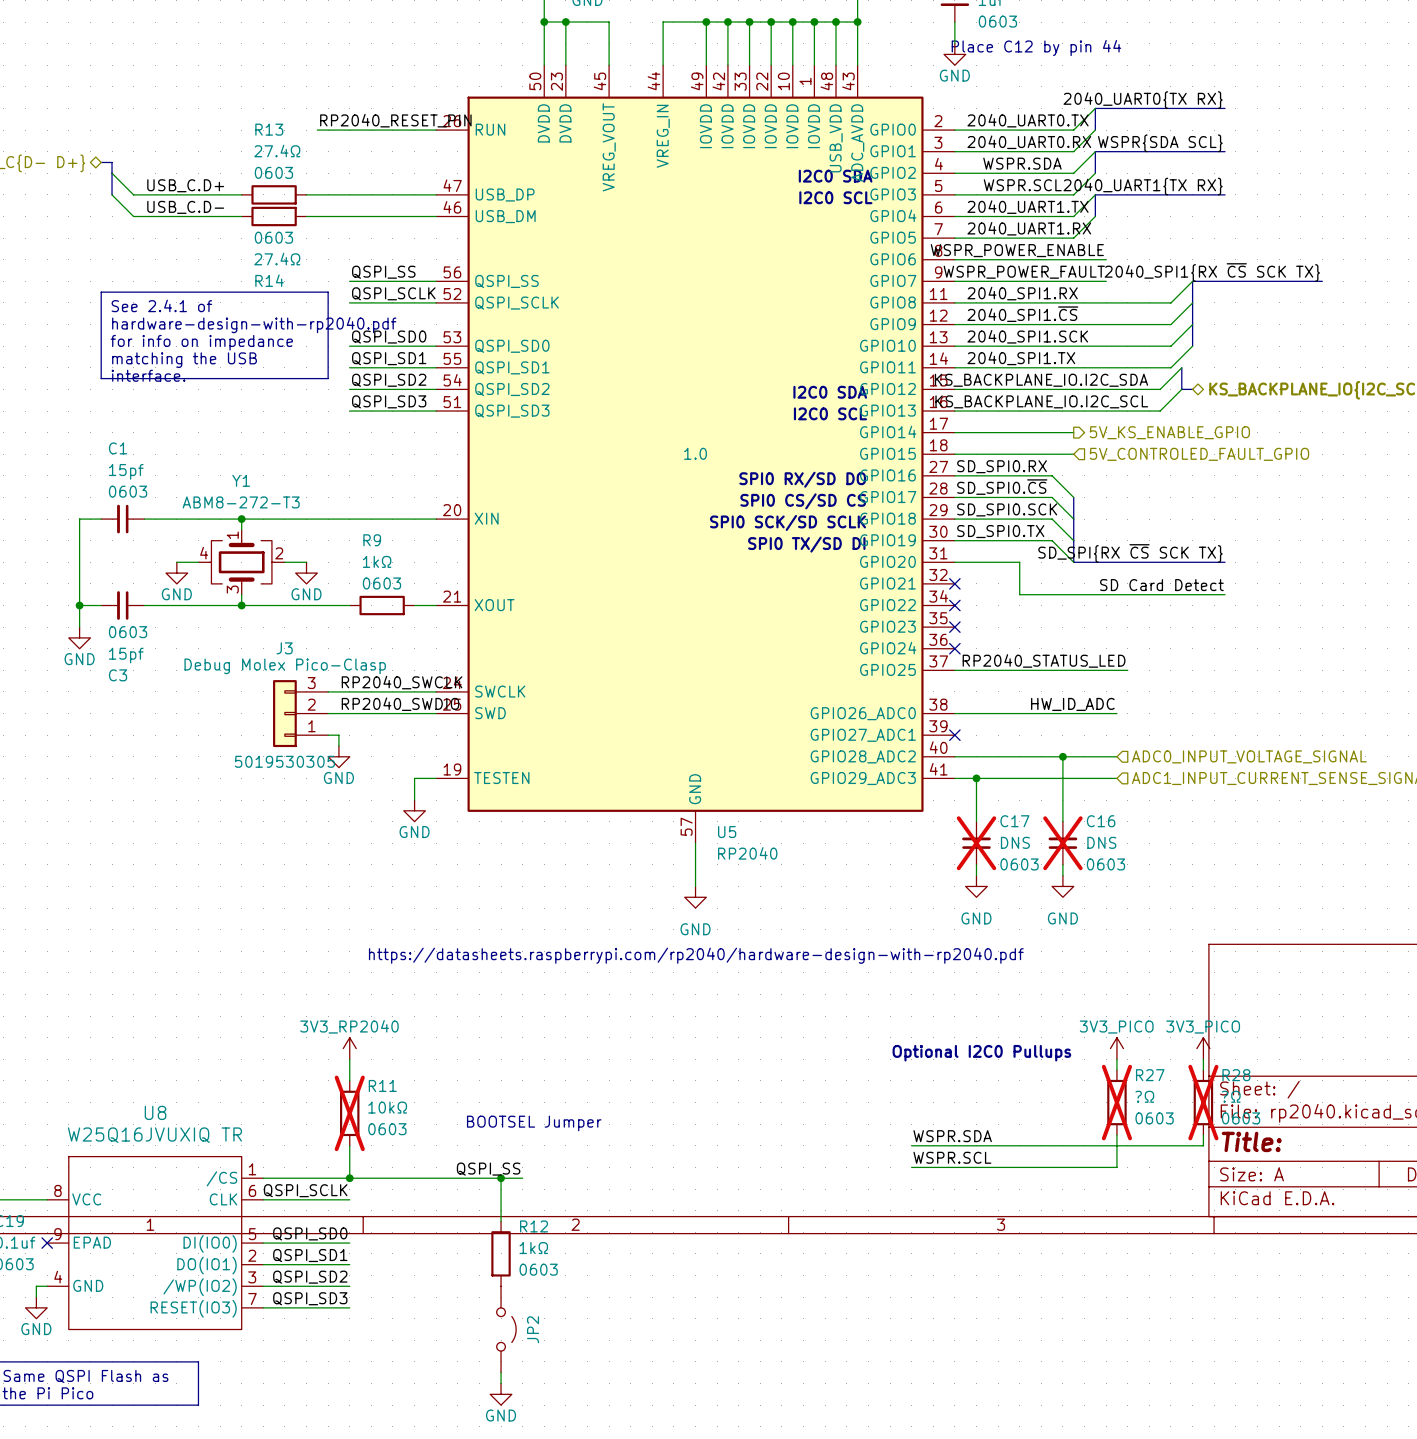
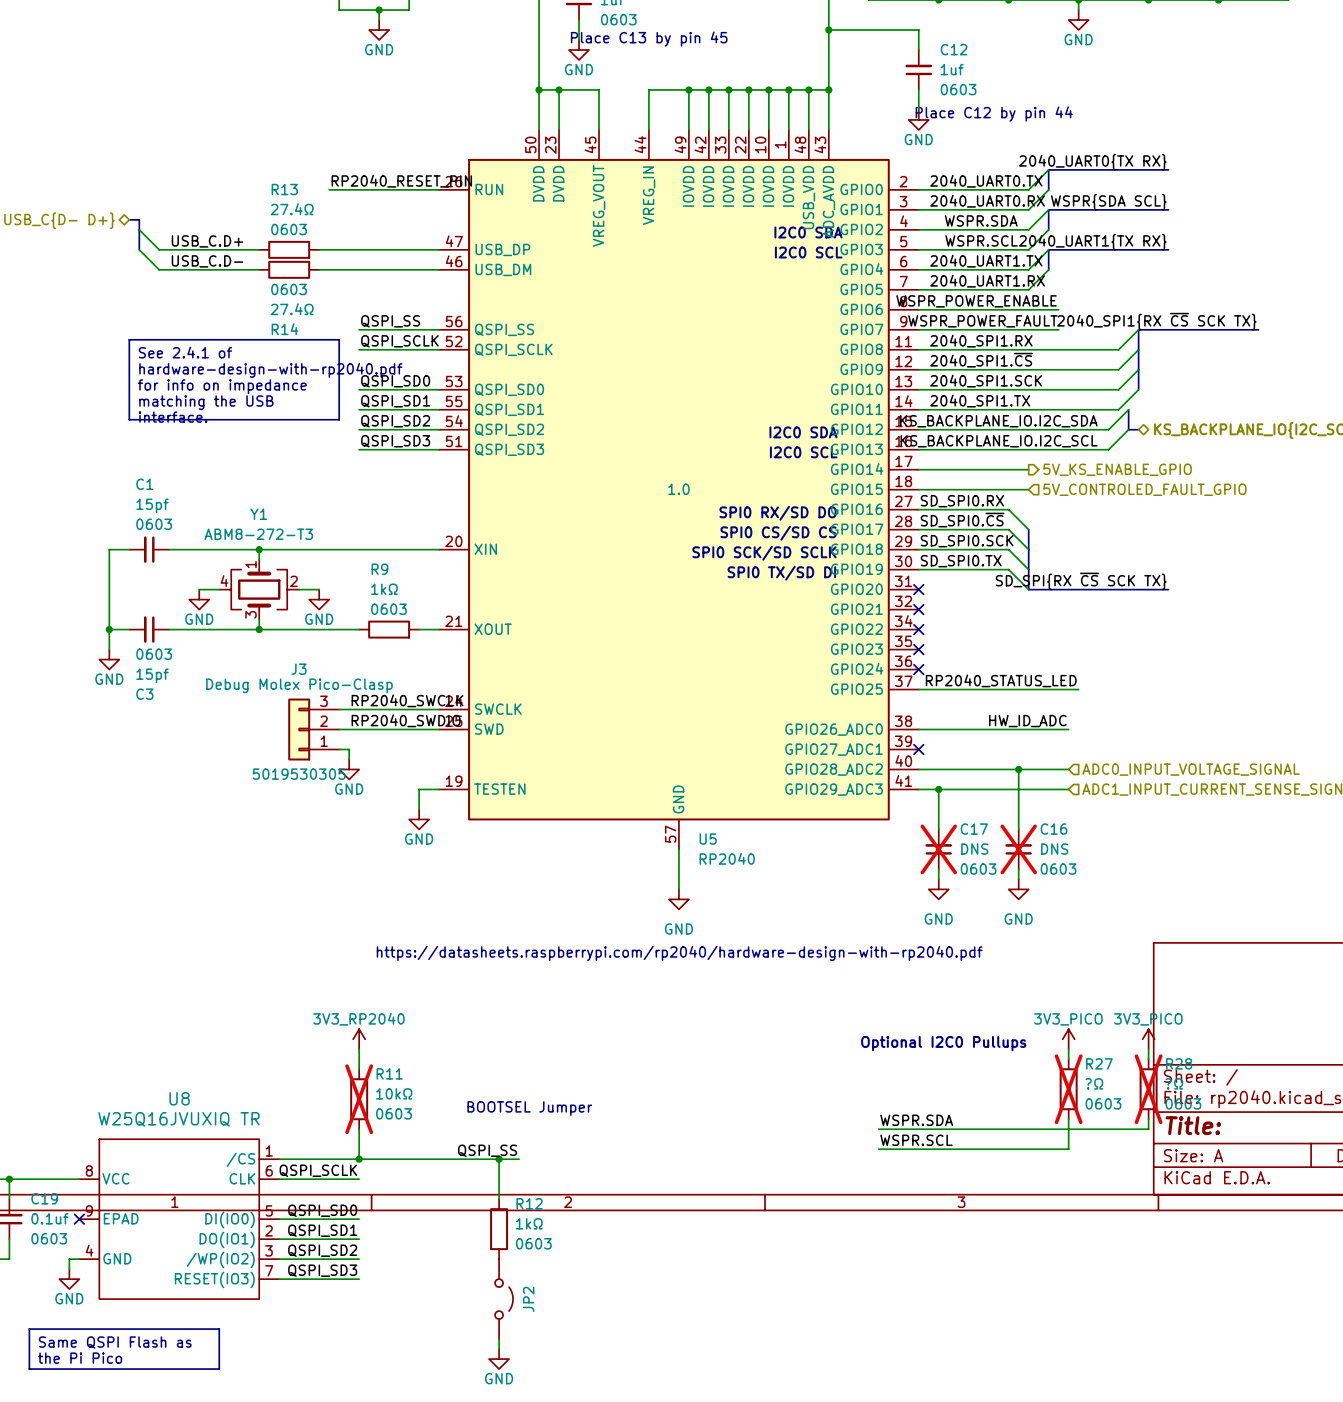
wire: (954, 562) (1019, 562) (1019, 594) (1225, 594) -> none
no-connect mark: none -> (918, 589)
label: SD Card Detect (1161, 585) -> none

